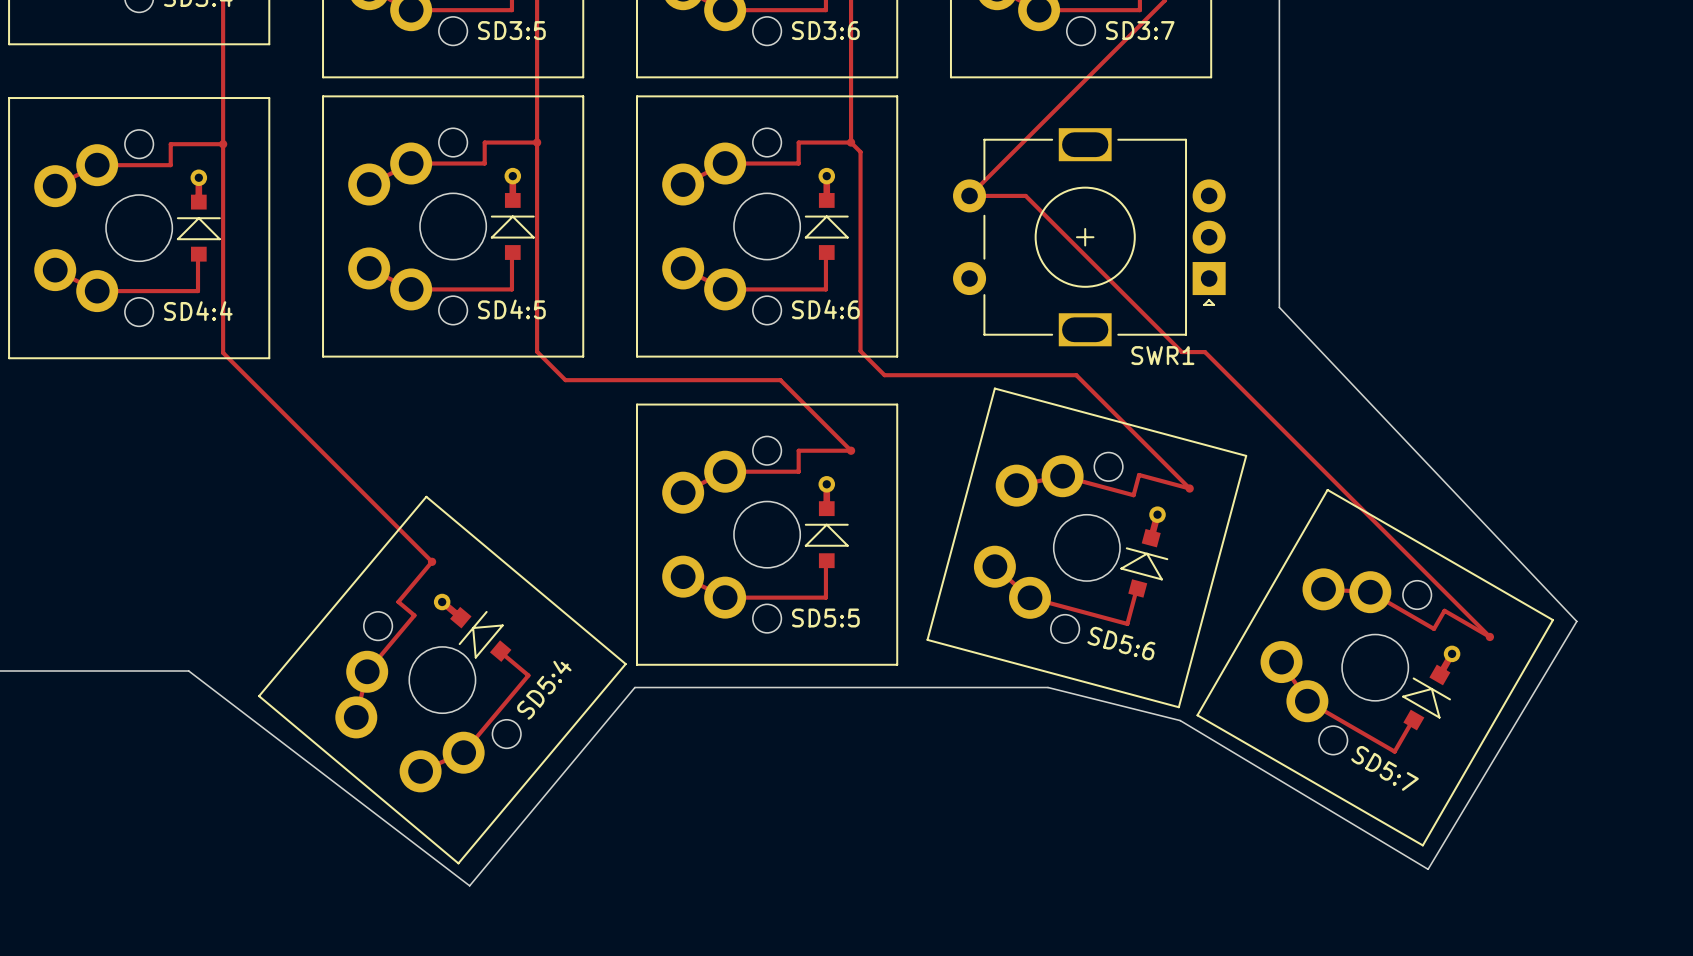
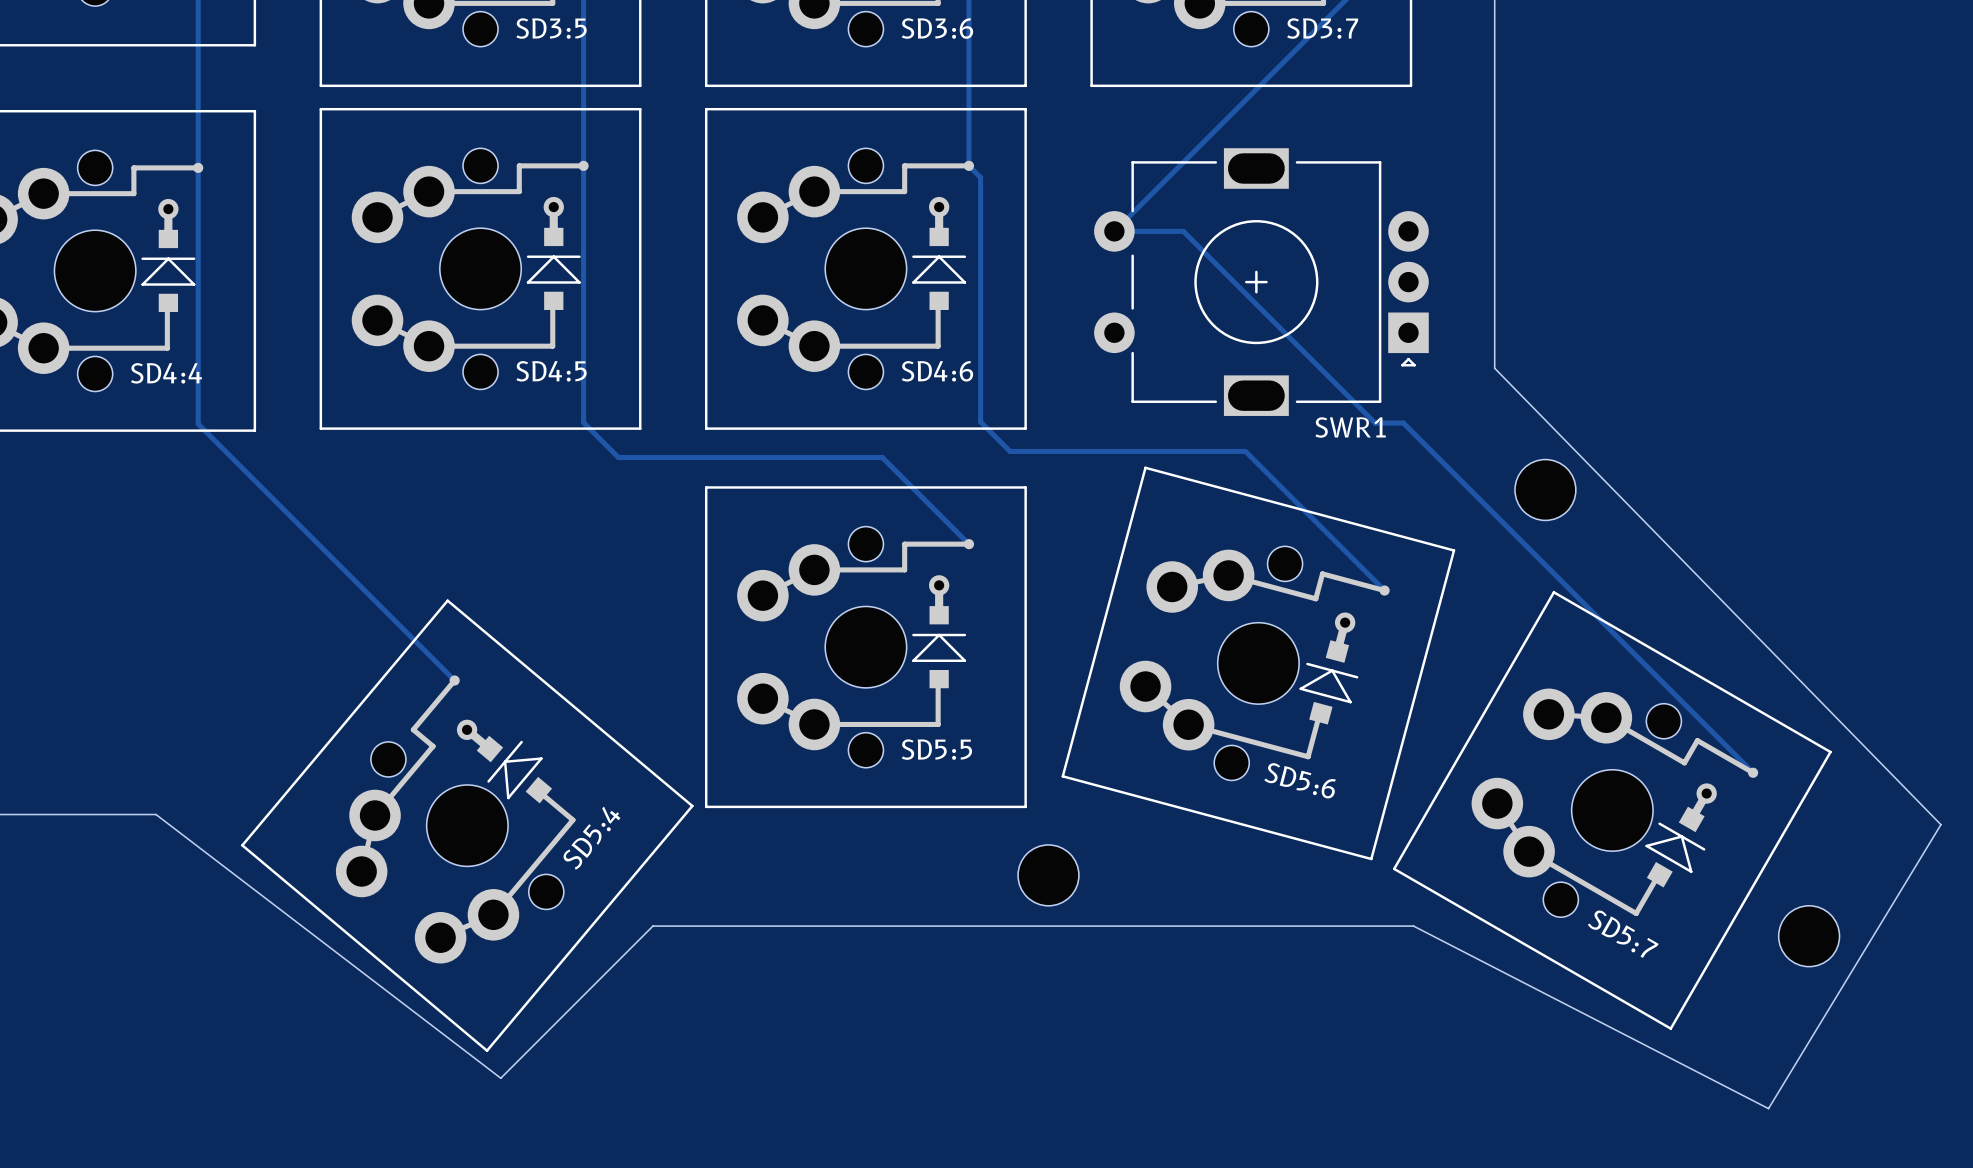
board edge: (1279, 307) (1576, 621) (1428, 869) (1180, 720) (1048, 687) (634, 687) (469, 885) -> (1494, 368) (1940, 824) (1768, 1108) (1413, 926) (652, 926) (500, 1078)
part: none -> (1545, 489)
part: none -> (1048, 875)
part: none -> (1809, 936)

